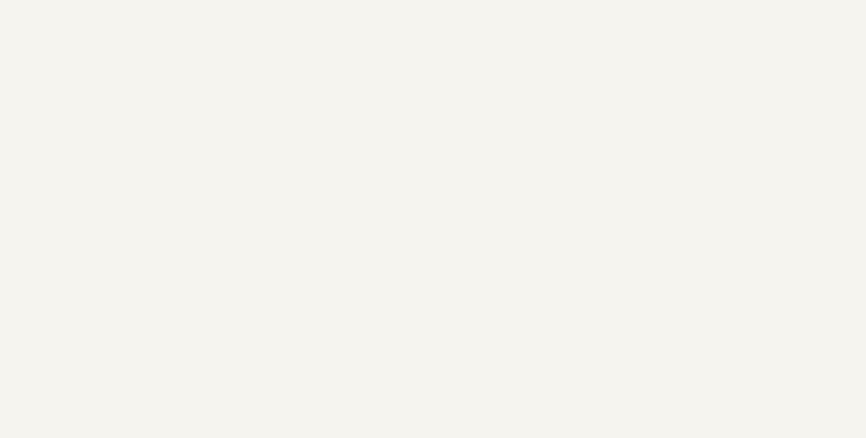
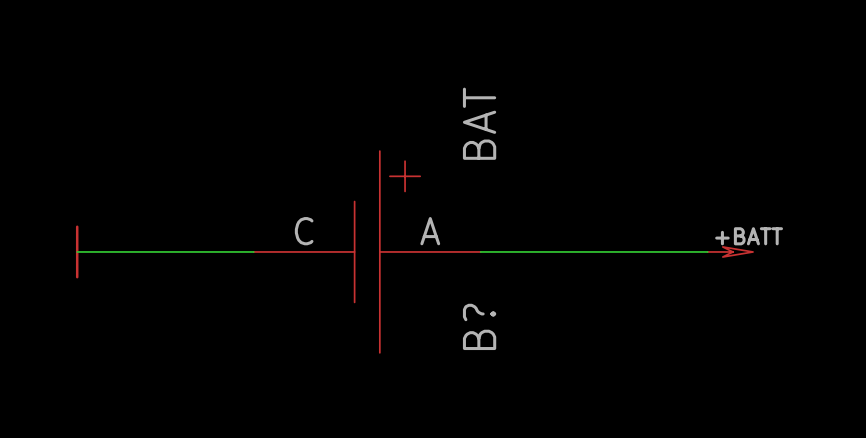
wire: none -> (77, 251) (253, 251)
power symbol: none -> (77, 251)
B?: none -> BAT (367, 251)
wire: none -> (480, 251) (707, 251)
power symbol: none -> +BATT (730, 251)

